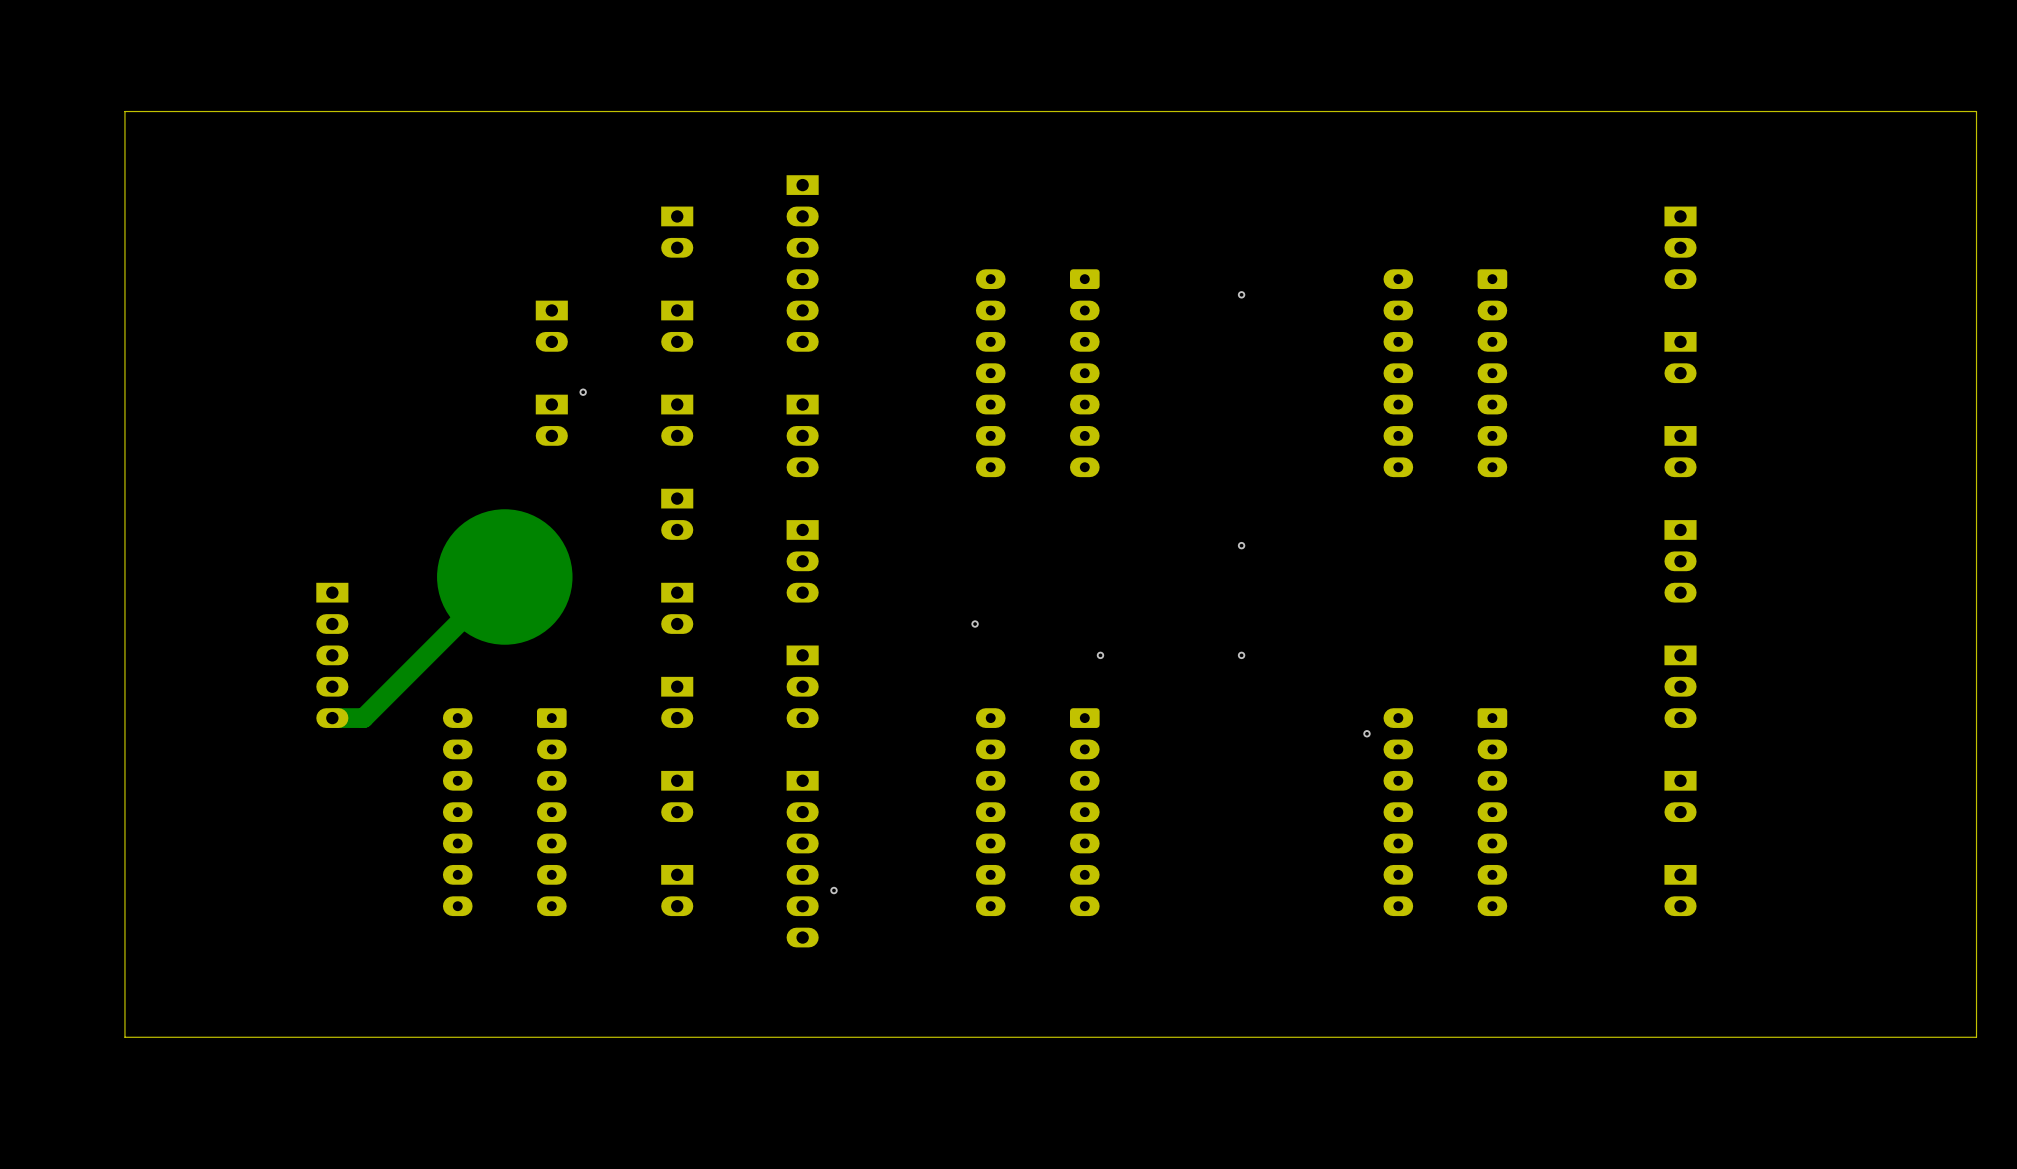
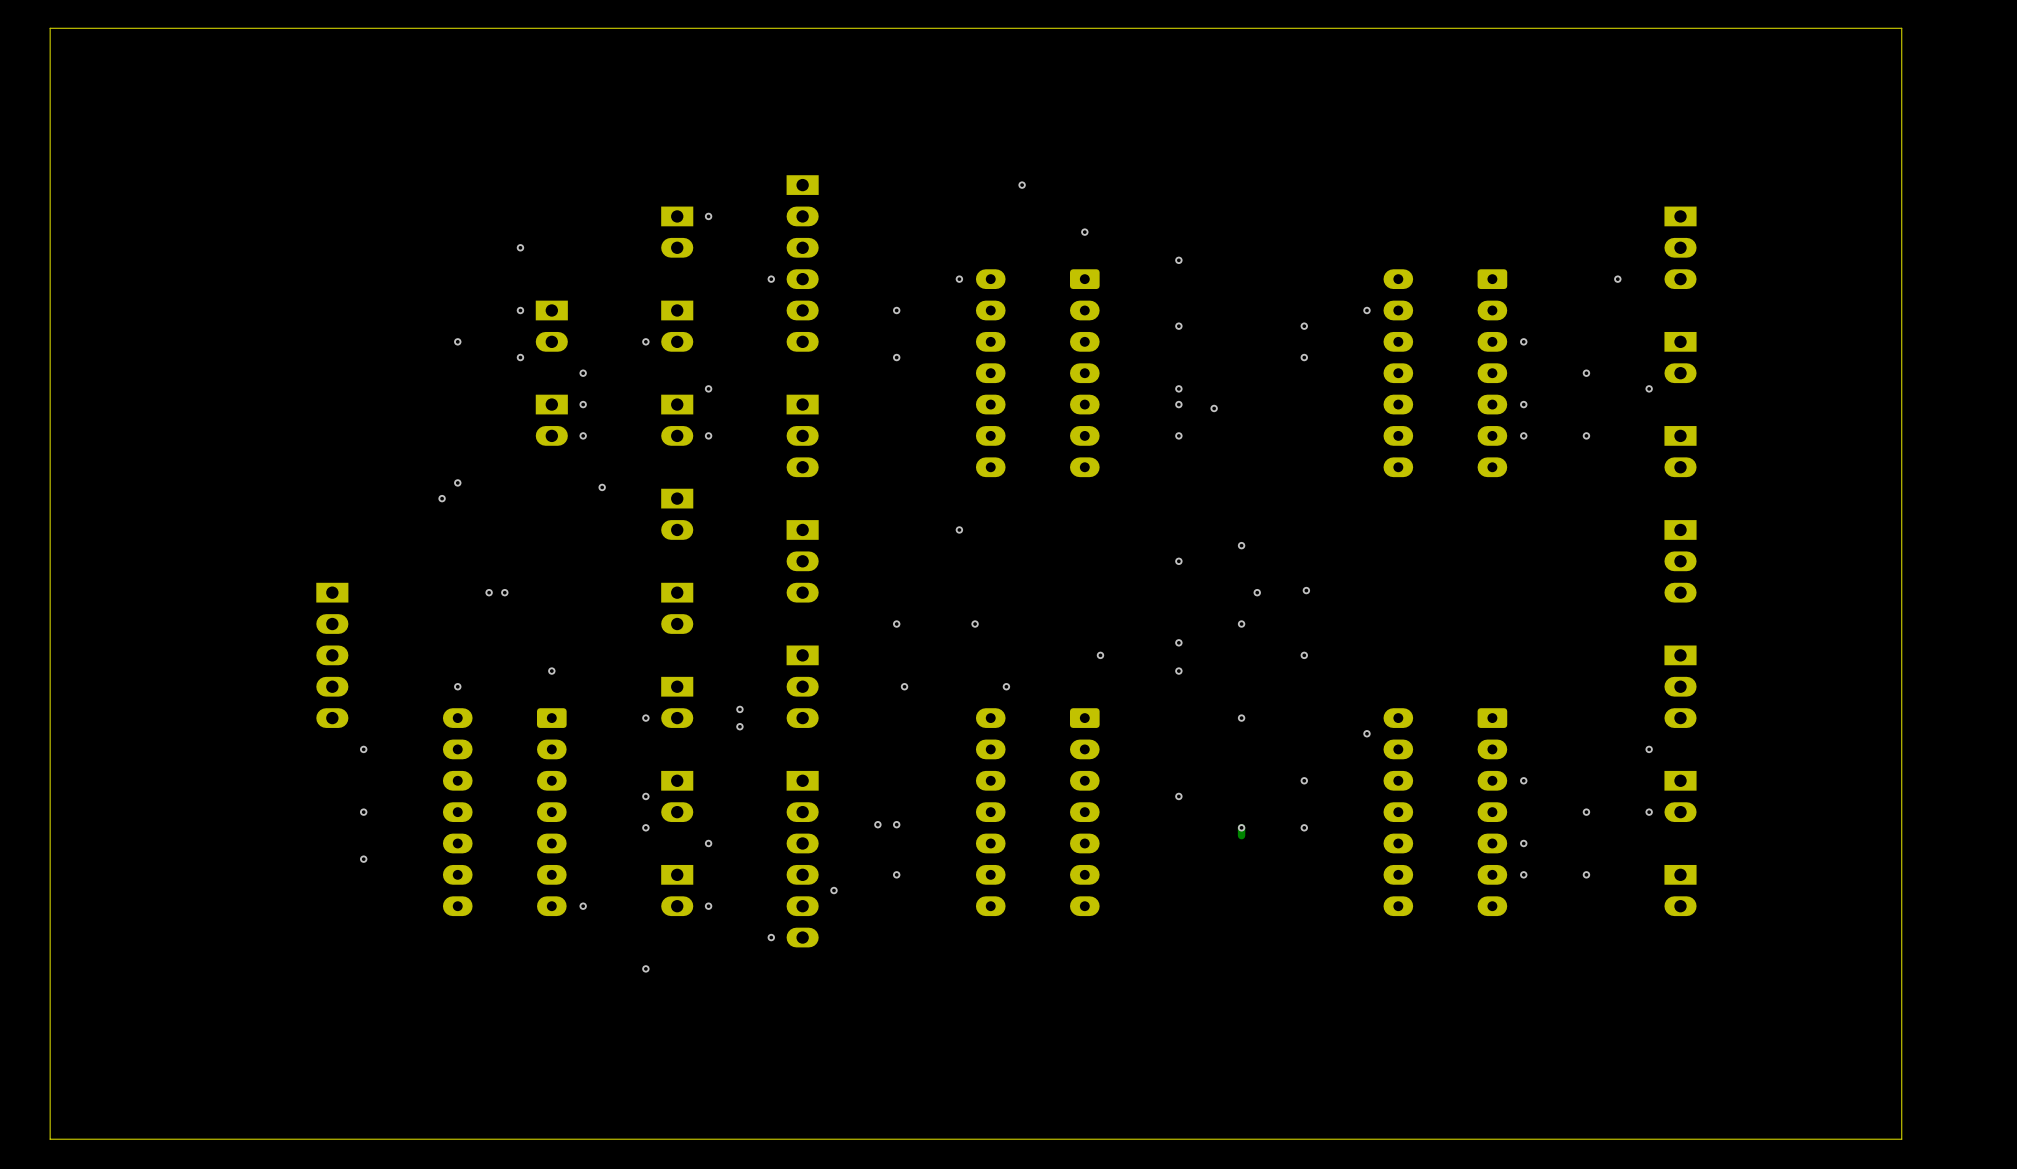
board edge: (1976, 111) (124, 111) (124, 1037) (1976, 1037) (1976, 111) -> (1901, 28) (1901, 1139) (50, 1139) (50, 28) (1901, 28)
via: none -> (1022, 185)
via: none -> (708, 216)
via: none -> (1084, 232)
via: none -> (520, 247)
via: none -> (1178, 260)
via: none -> (771, 279)
via: none -> (959, 279)
via: none -> (1617, 279)
via: (1241, 294) -> none
via: none -> (520, 310)
via: none -> (896, 310)
via: none -> (1366, 310)
via: none -> (1178, 326)
via: none -> (1304, 326)
via: none -> (457, 341)
via: none -> (645, 341)
via: none -> (1523, 341)
via: none -> (520, 357)
via: none -> (896, 357)
via: none -> (1304, 357)
via: none -> (583, 373)
via: none -> (1586, 373)
via: none -> (708, 388)
via: none -> (1178, 388)
via: none -> (1649, 388)
via: (583, 392) -> none
via: none -> (583, 404)
via: none -> (1178, 404)
via: none -> (1523, 404)
via: none -> (1214, 408)
via: none -> (583, 435)
via: none -> (708, 435)
via: none -> (1178, 435)
via: none -> (1523, 435)
via: none -> (1586, 435)
via: none -> (457, 482)
via: none -> (602, 487)
via: none -> (442, 498)
drawing: [437, 509, 573, 645] -> none
via: none -> (959, 529)
via: none -> (1178, 561)
track: (504, 576) (363, 718) (332, 718) -> none
via: none -> (1306, 590)
via: none -> (489, 592)
via: none -> (504, 592)
via: none -> (1257, 592)
via: none -> (896, 624)
via: none -> (1241, 624)
via: none -> (1178, 642)
via: (1241, 655) -> none
via: none -> (1304, 655)
via: none -> (551, 671)
via: none -> (1178, 671)
via: none -> (457, 686)
via: none -> (904, 686)
via: none -> (1006, 686)
via: none -> (739, 709)
via: none -> (645, 718)
via: none -> (1241, 718)
via: none -> (739, 726)
via: none -> (363, 749)
via: none -> (1649, 749)
via: none -> (1304, 780)
via: none -> (1523, 780)
via: none -> (645, 796)
via: none -> (1178, 796)
via: none -> (363, 812)
via: none -> (1586, 812)
via: none -> (1649, 812)
via: none -> (877, 824)
via: none -> (896, 824)
via: none -> (645, 827)
track: none -> (1241, 827) (1241, 835)
via: none -> (1241, 827)
via: none -> (1304, 827)
via: none -> (708, 843)
via: none -> (1523, 843)
via: none -> (363, 859)
via: none -> (896, 874)
via: none -> (1523, 874)
via: none -> (1586, 874)
via: none -> (583, 906)
via: none -> (708, 906)
via: none -> (771, 937)
via: none -> (645, 968)

